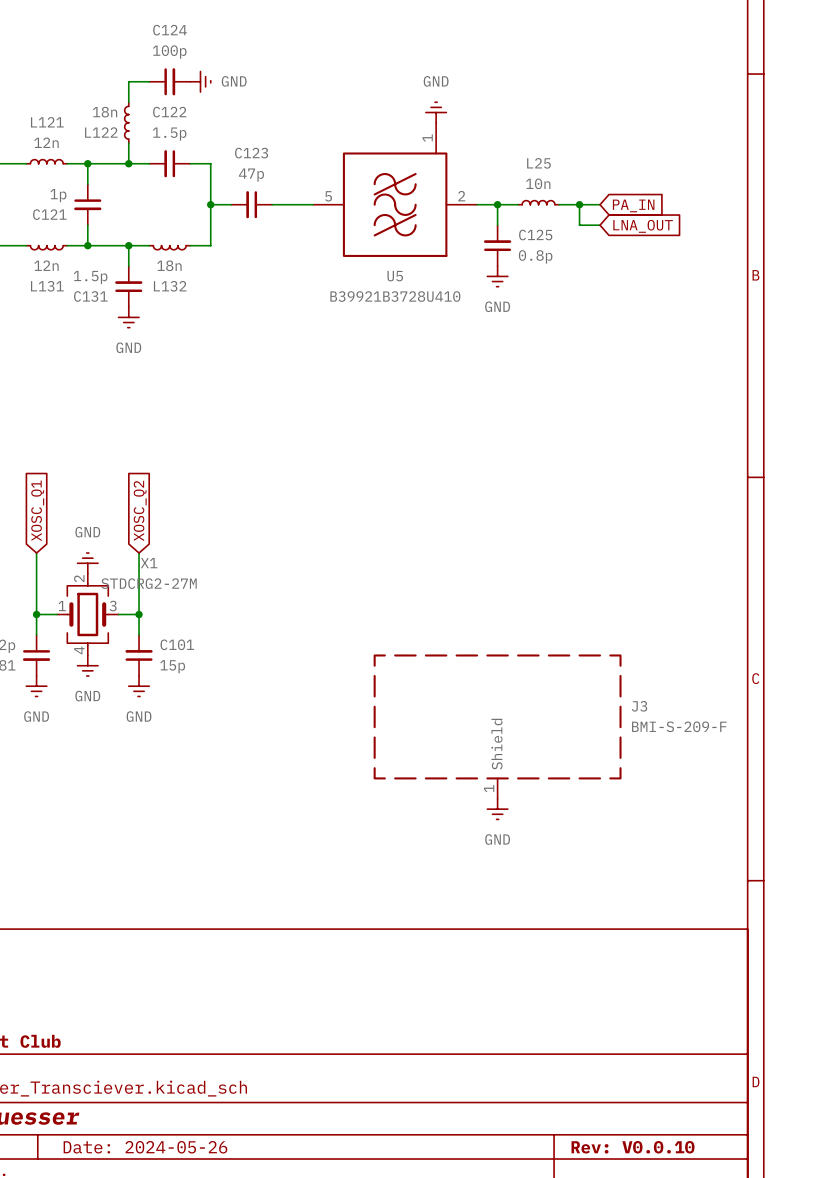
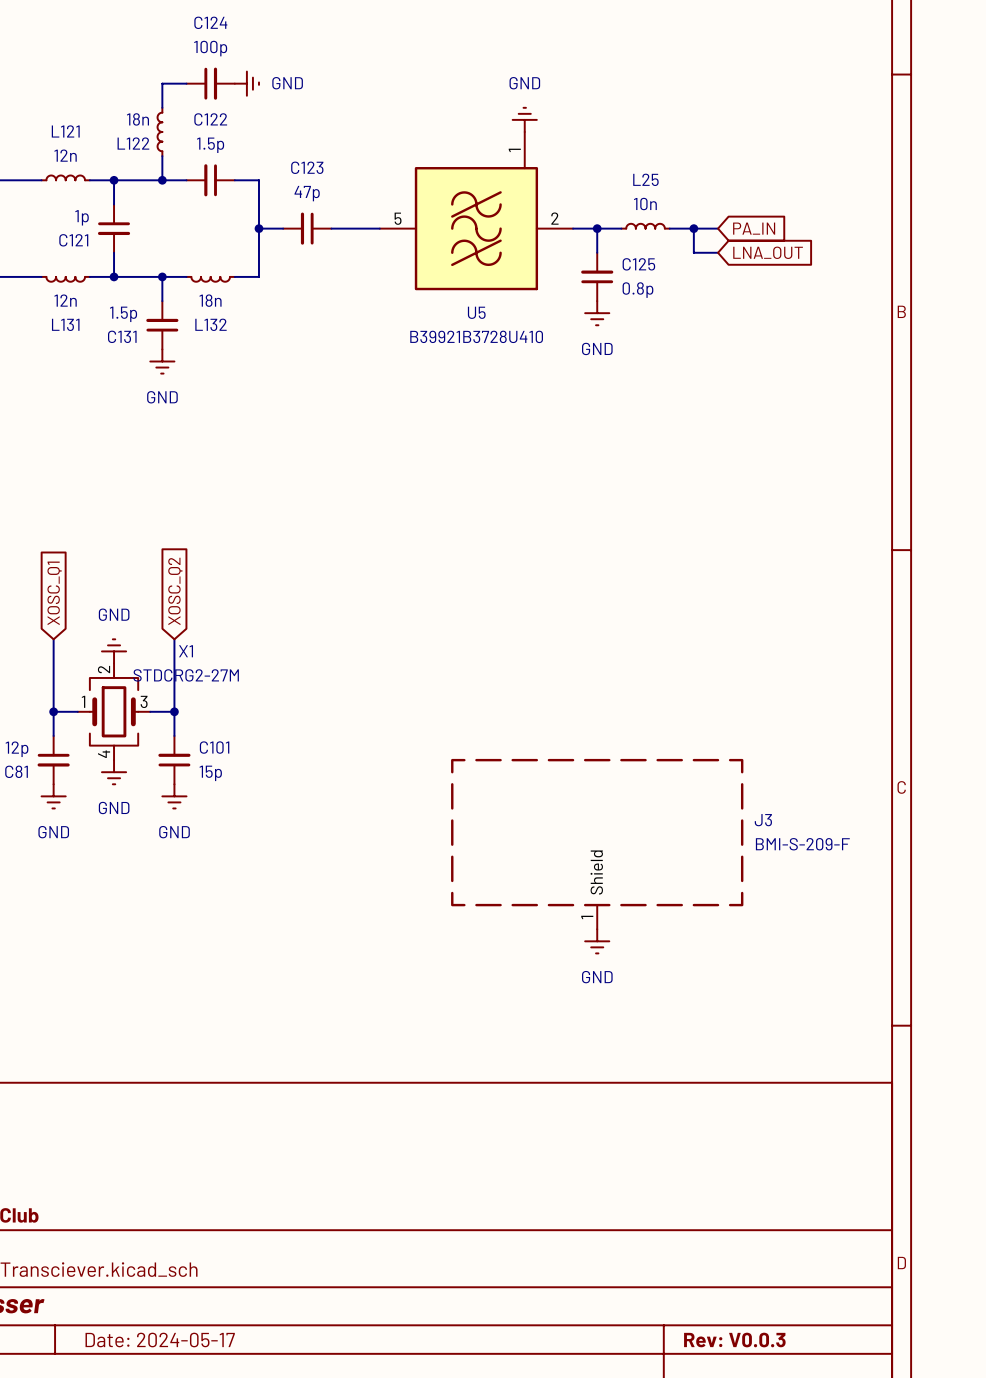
title block: Date: 2024-05-26 (145, 1147) -> Date: 2024-05-17 (160, 1340)
title block: Rev: V0.0.10 (633, 1147) -> Rev: V0.0.3 (734, 1340)

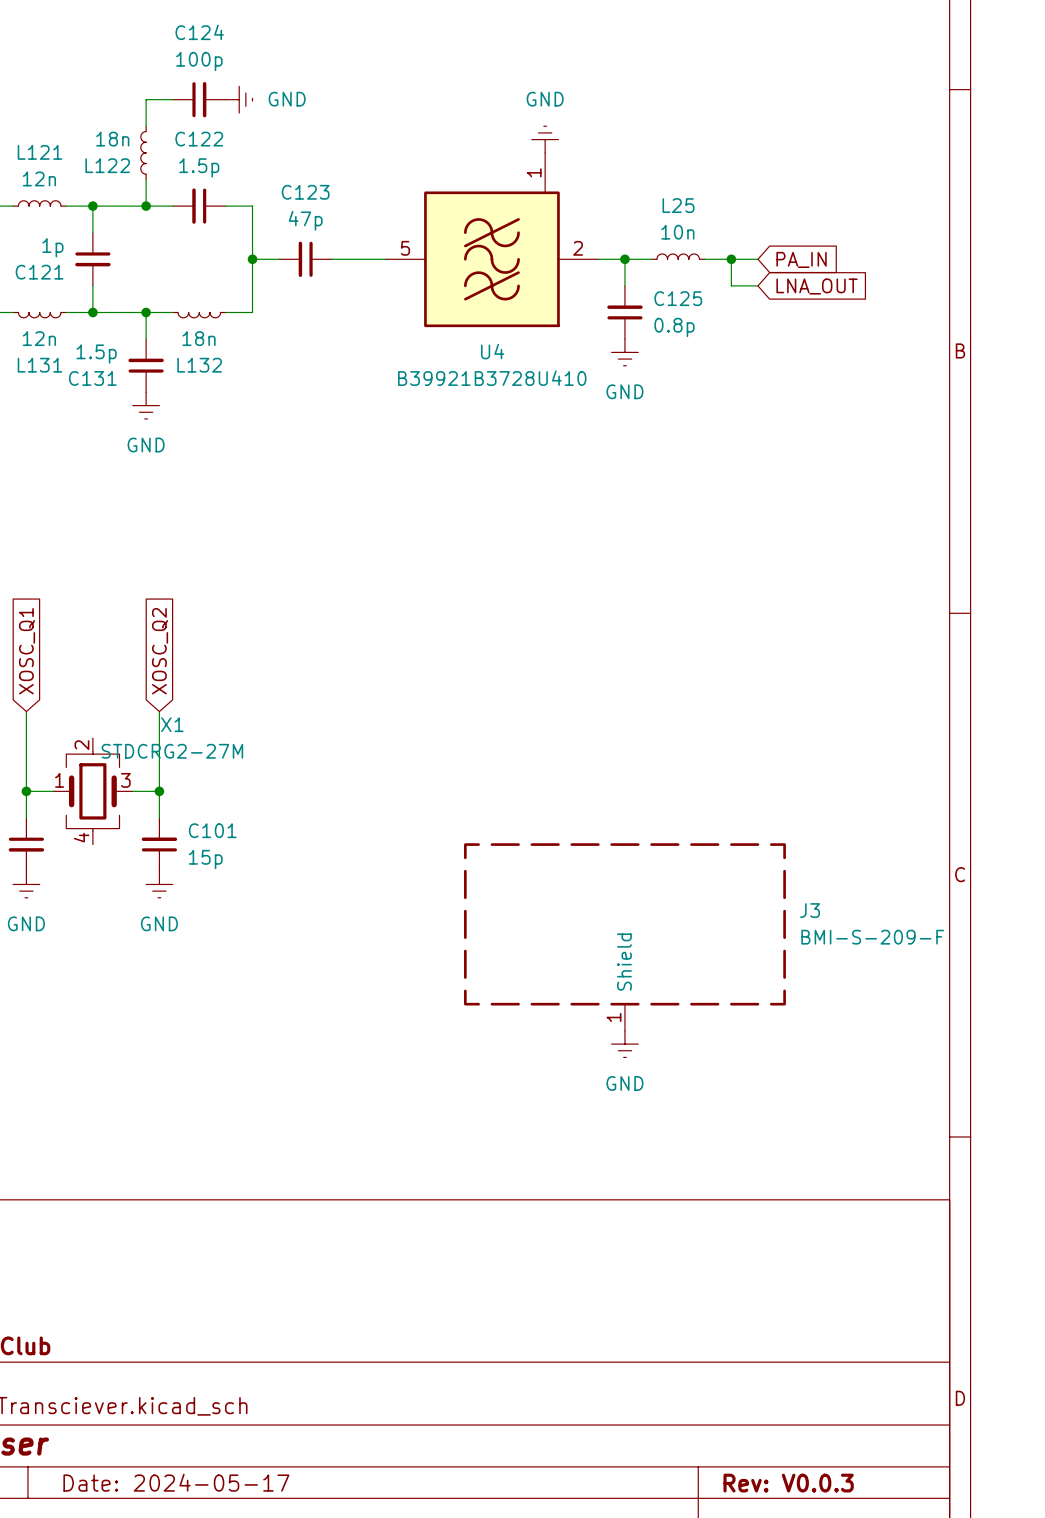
U5 name: U5 (476, 312) -> U4 (492, 351)
power symbol: GND (114, 651) -> none
power symbol: GND (114, 772) -> none

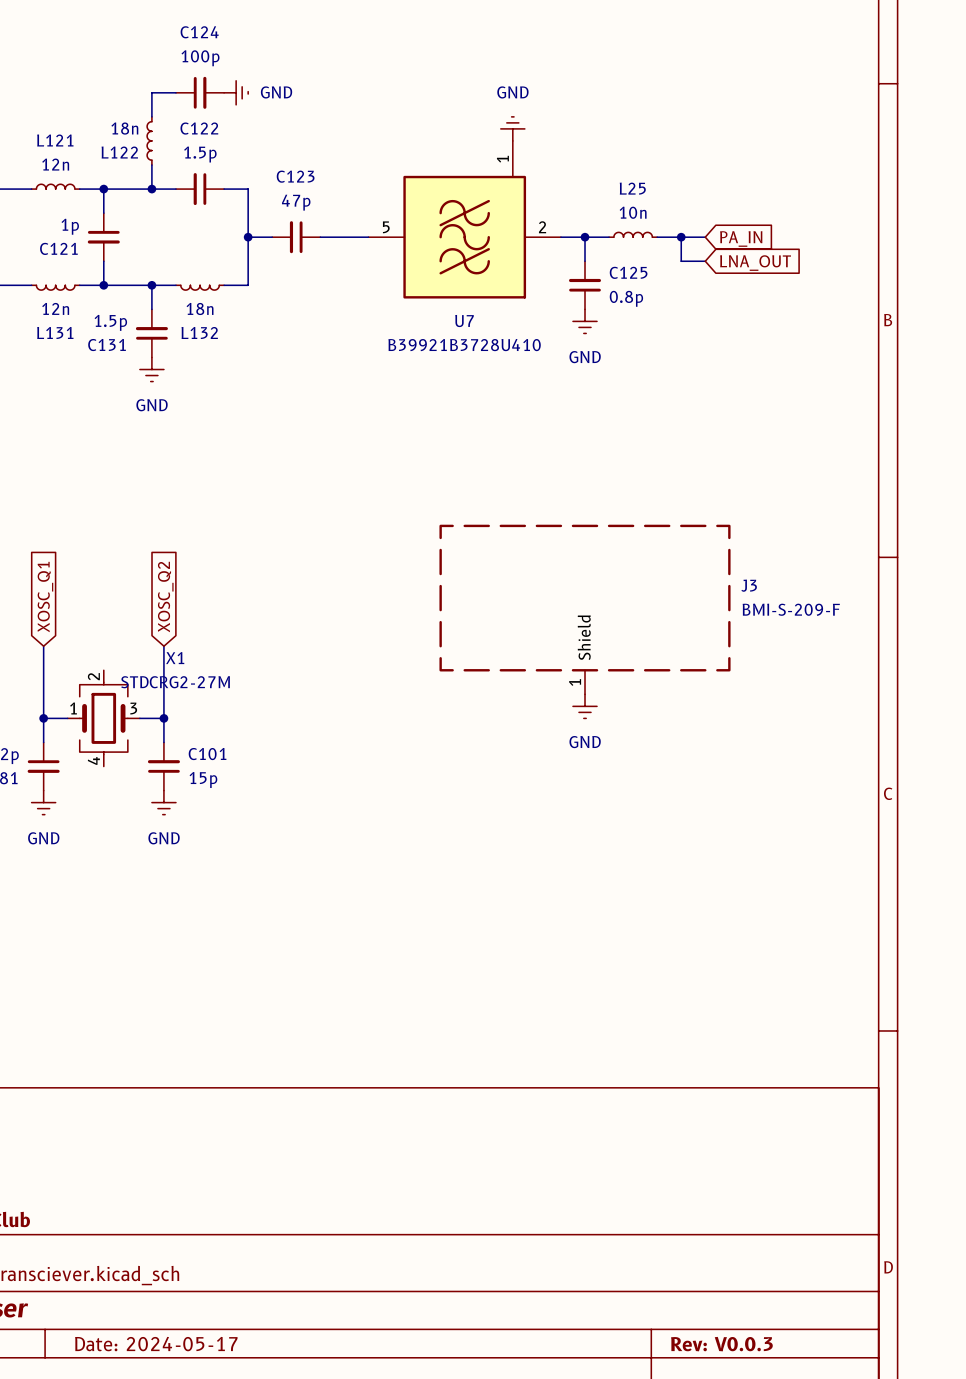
U4 name: U4 (492, 351) -> U7 (464, 321)
power symbol: none -> GND (585, 706)
J3 position: (624, 937) -> (585, 609)
power symbol: GND (624, 1044) -> none

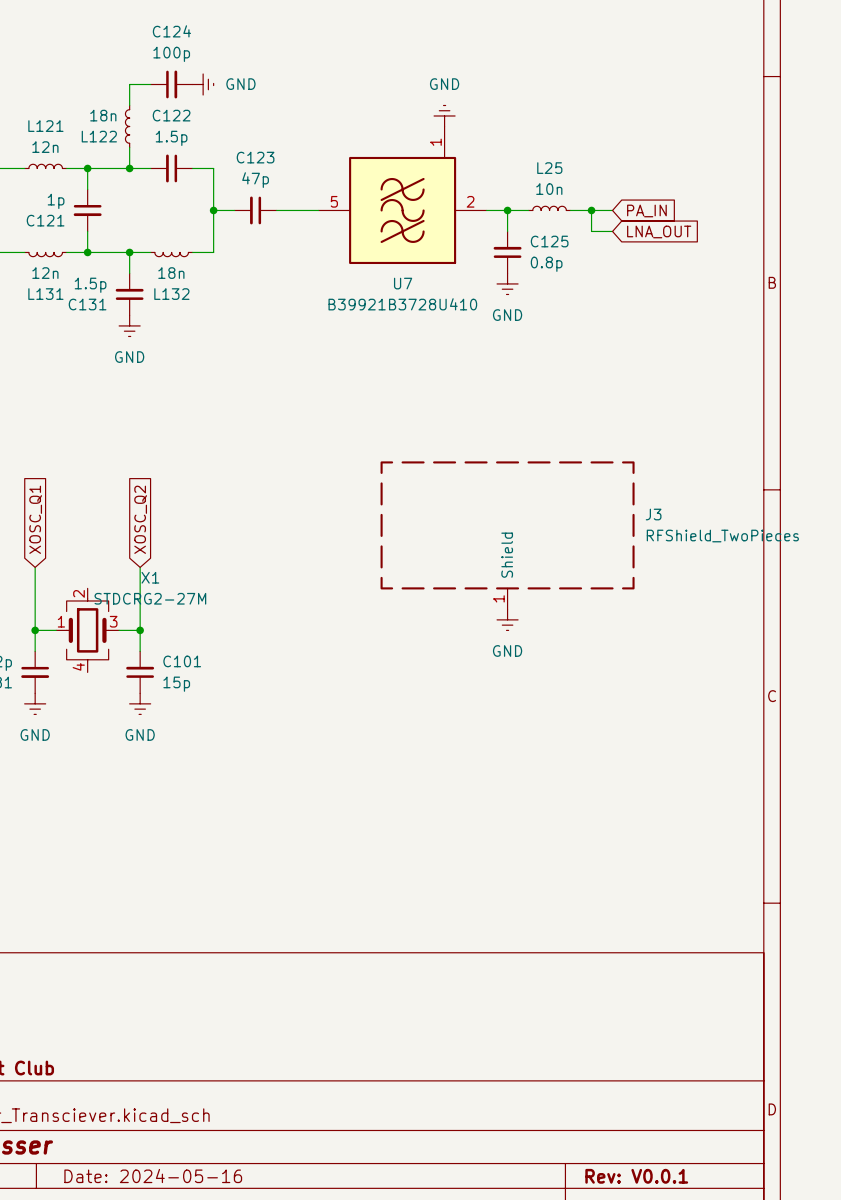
J3 value: BMI-S-209-F (791, 609) -> RFShield_TwoPieces (722, 536)
title block: Date: 2024-05-17 (156, 1344) -> Date: 2024-05-16 (153, 1176)
title block: Rev: V0.0.3 (721, 1344) -> Rev: V0.0.1 (636, 1176)

